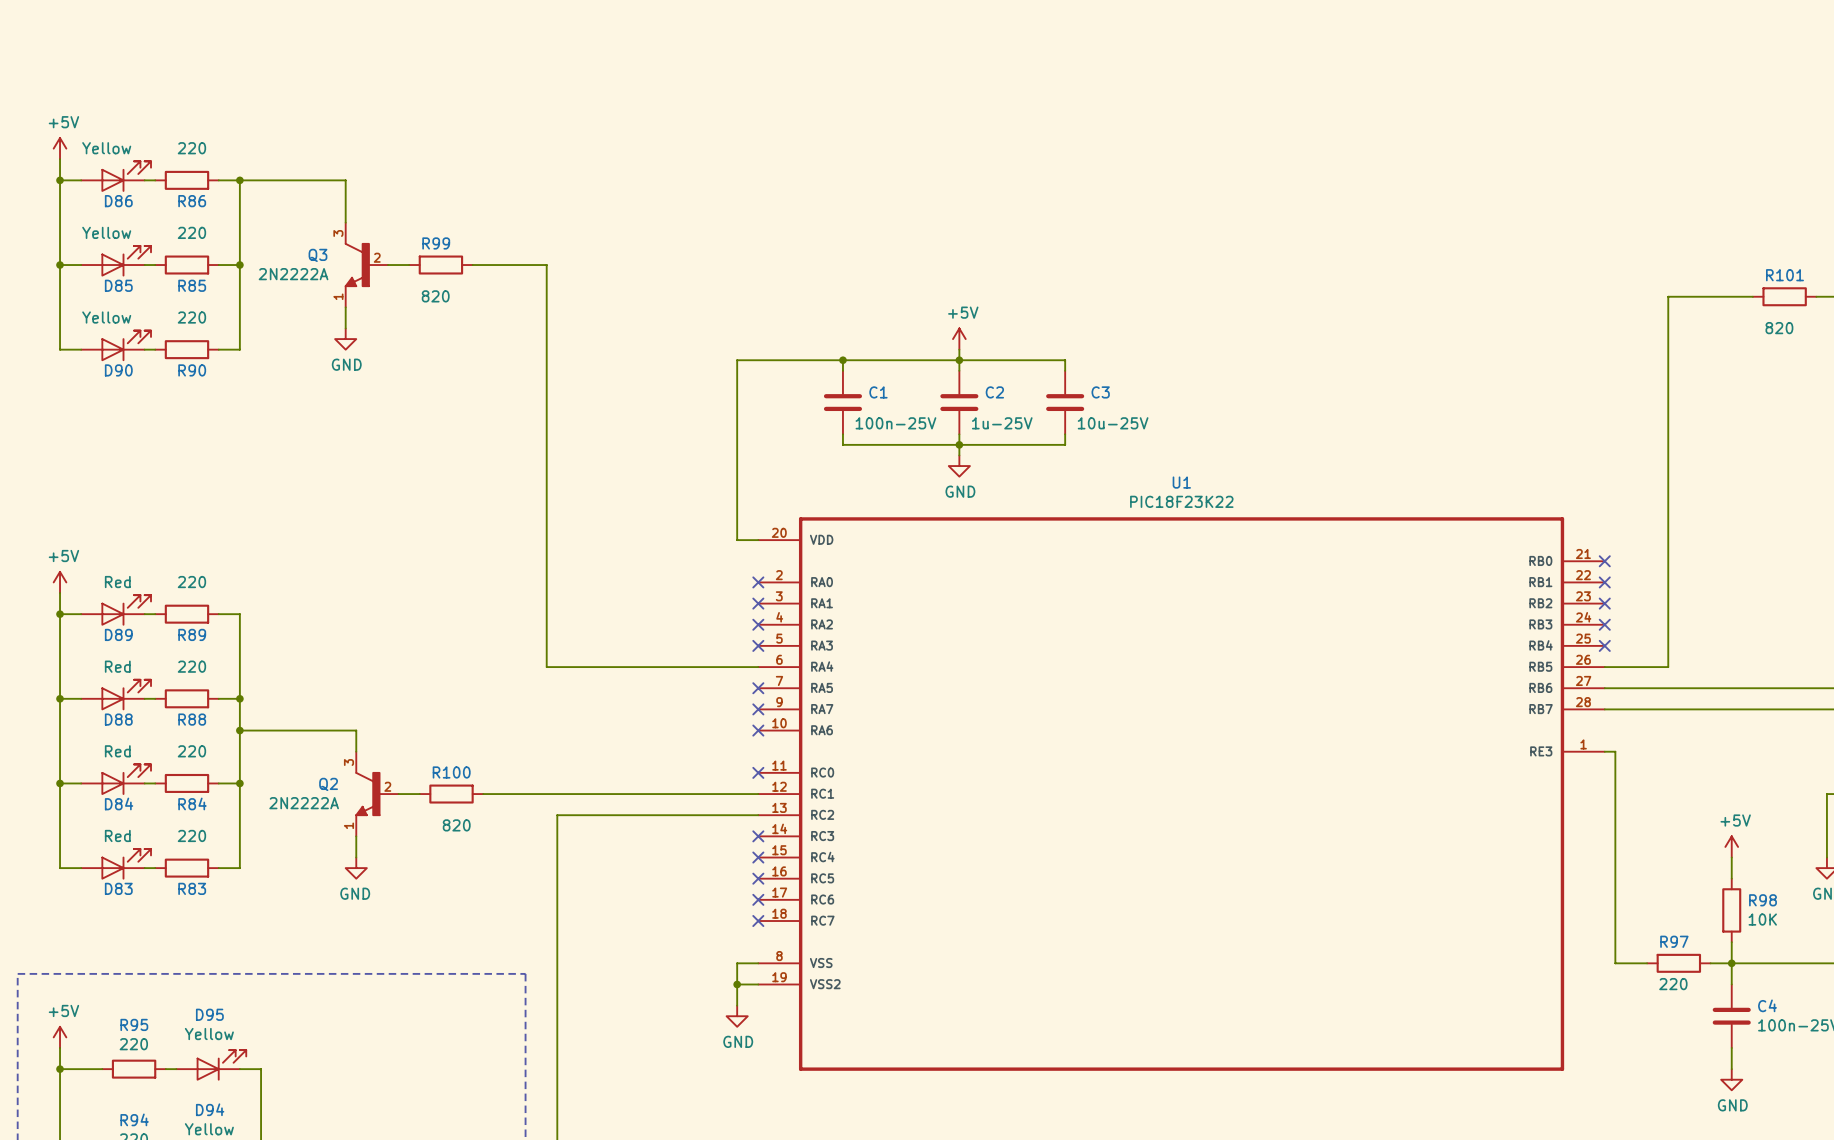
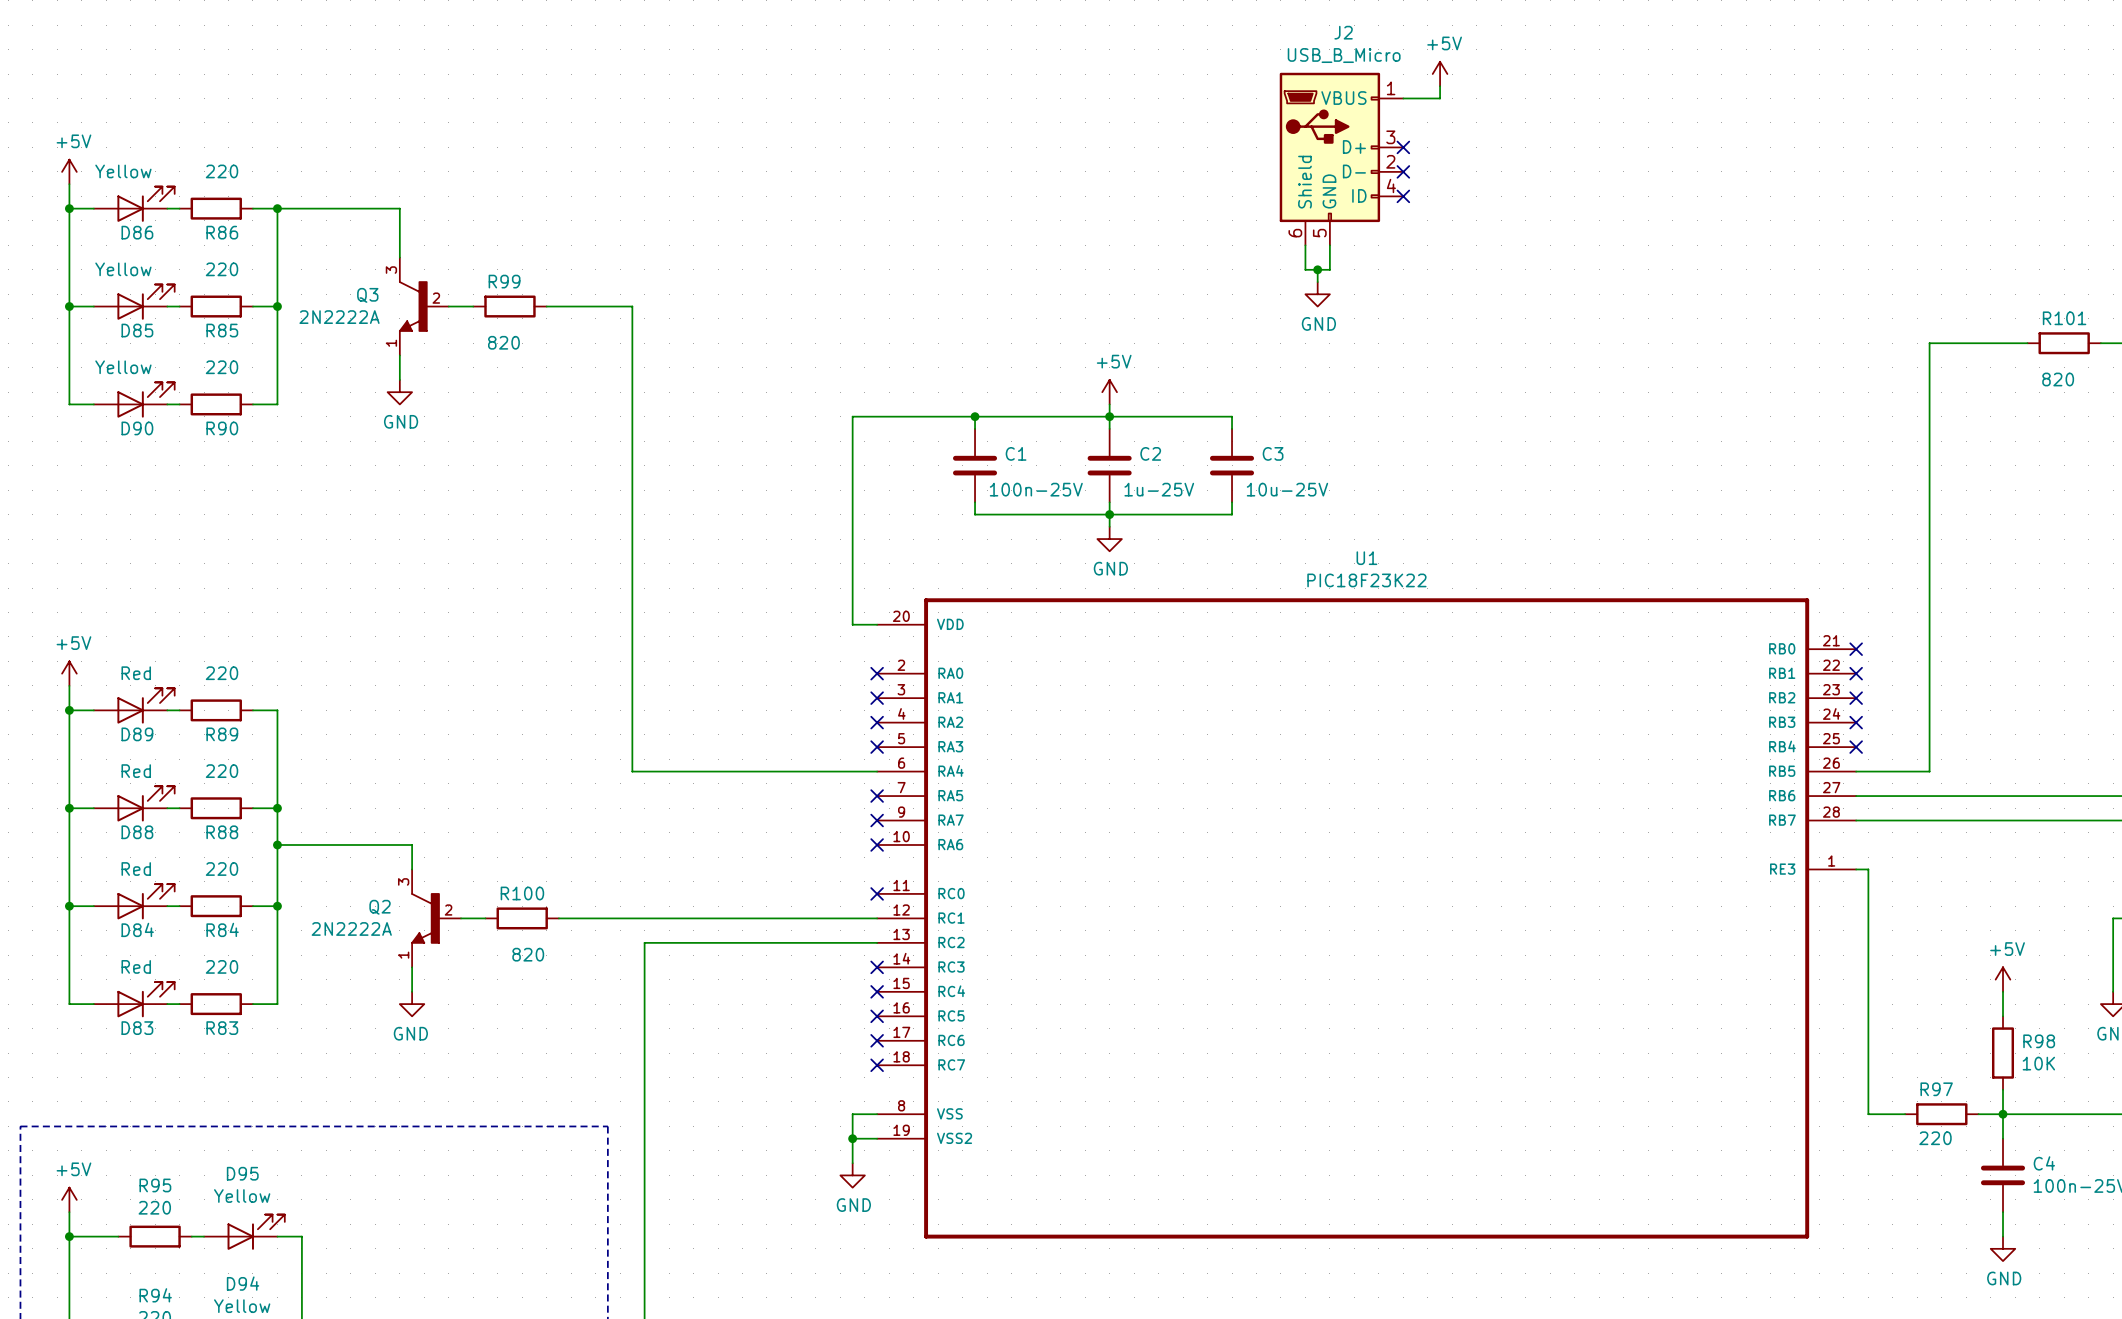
power symbol: none -> +5V (1440, 74)
wire: none -> (1440, 86) (1440, 98) (1403, 98)
no-connect mark: none -> (1403, 147)
J2: none -> USB_B_Micro (1341, 159)
no-connect mark: none -> (1403, 171)
no-connect mark: none -> (1403, 196)
wire: none -> (1305, 245) (1305, 269) (1329, 269) (1329, 245)
wire: none -> (1317, 269) (1317, 282)
junction: none -> (1317, 269)
power symbol: none -> GND (1317, 294)

